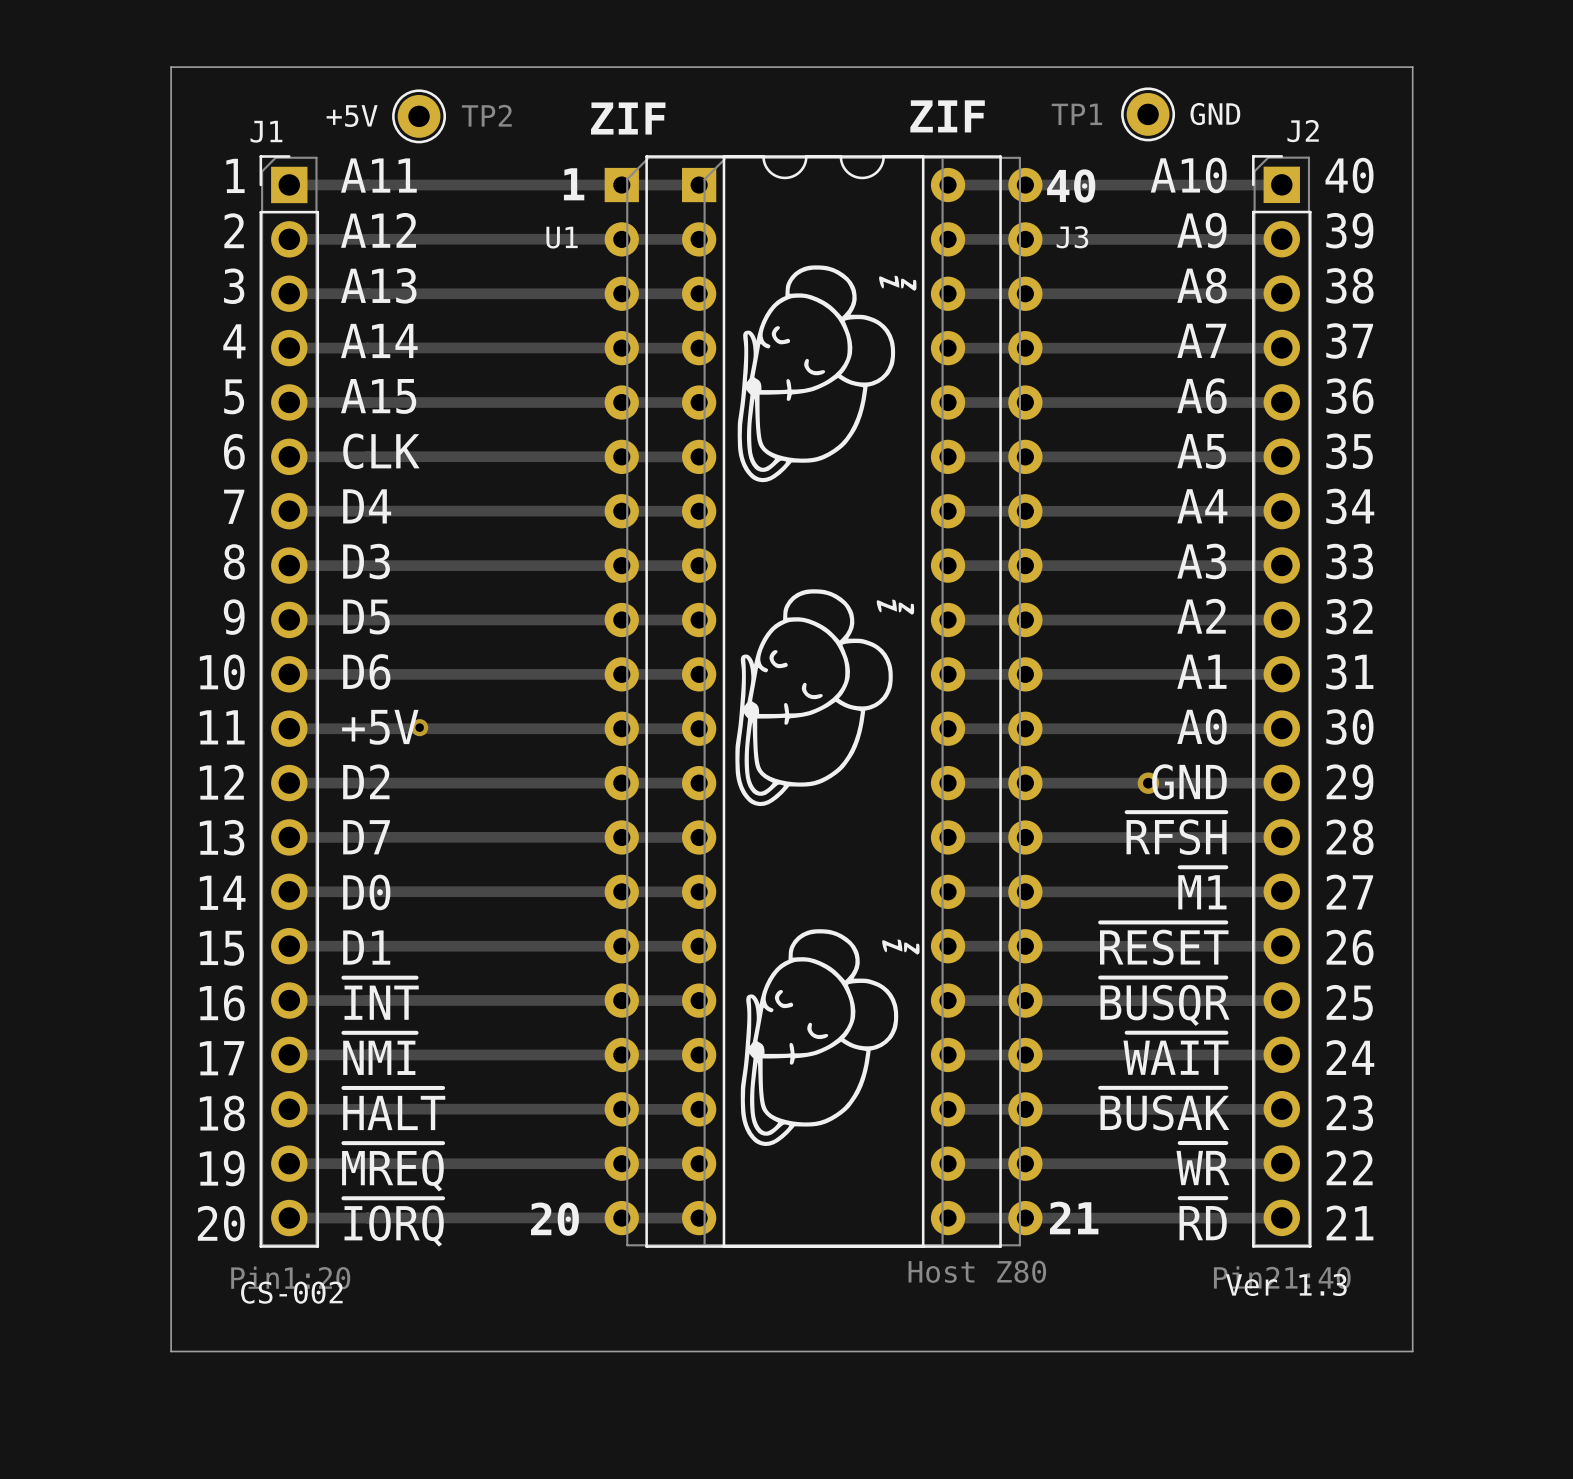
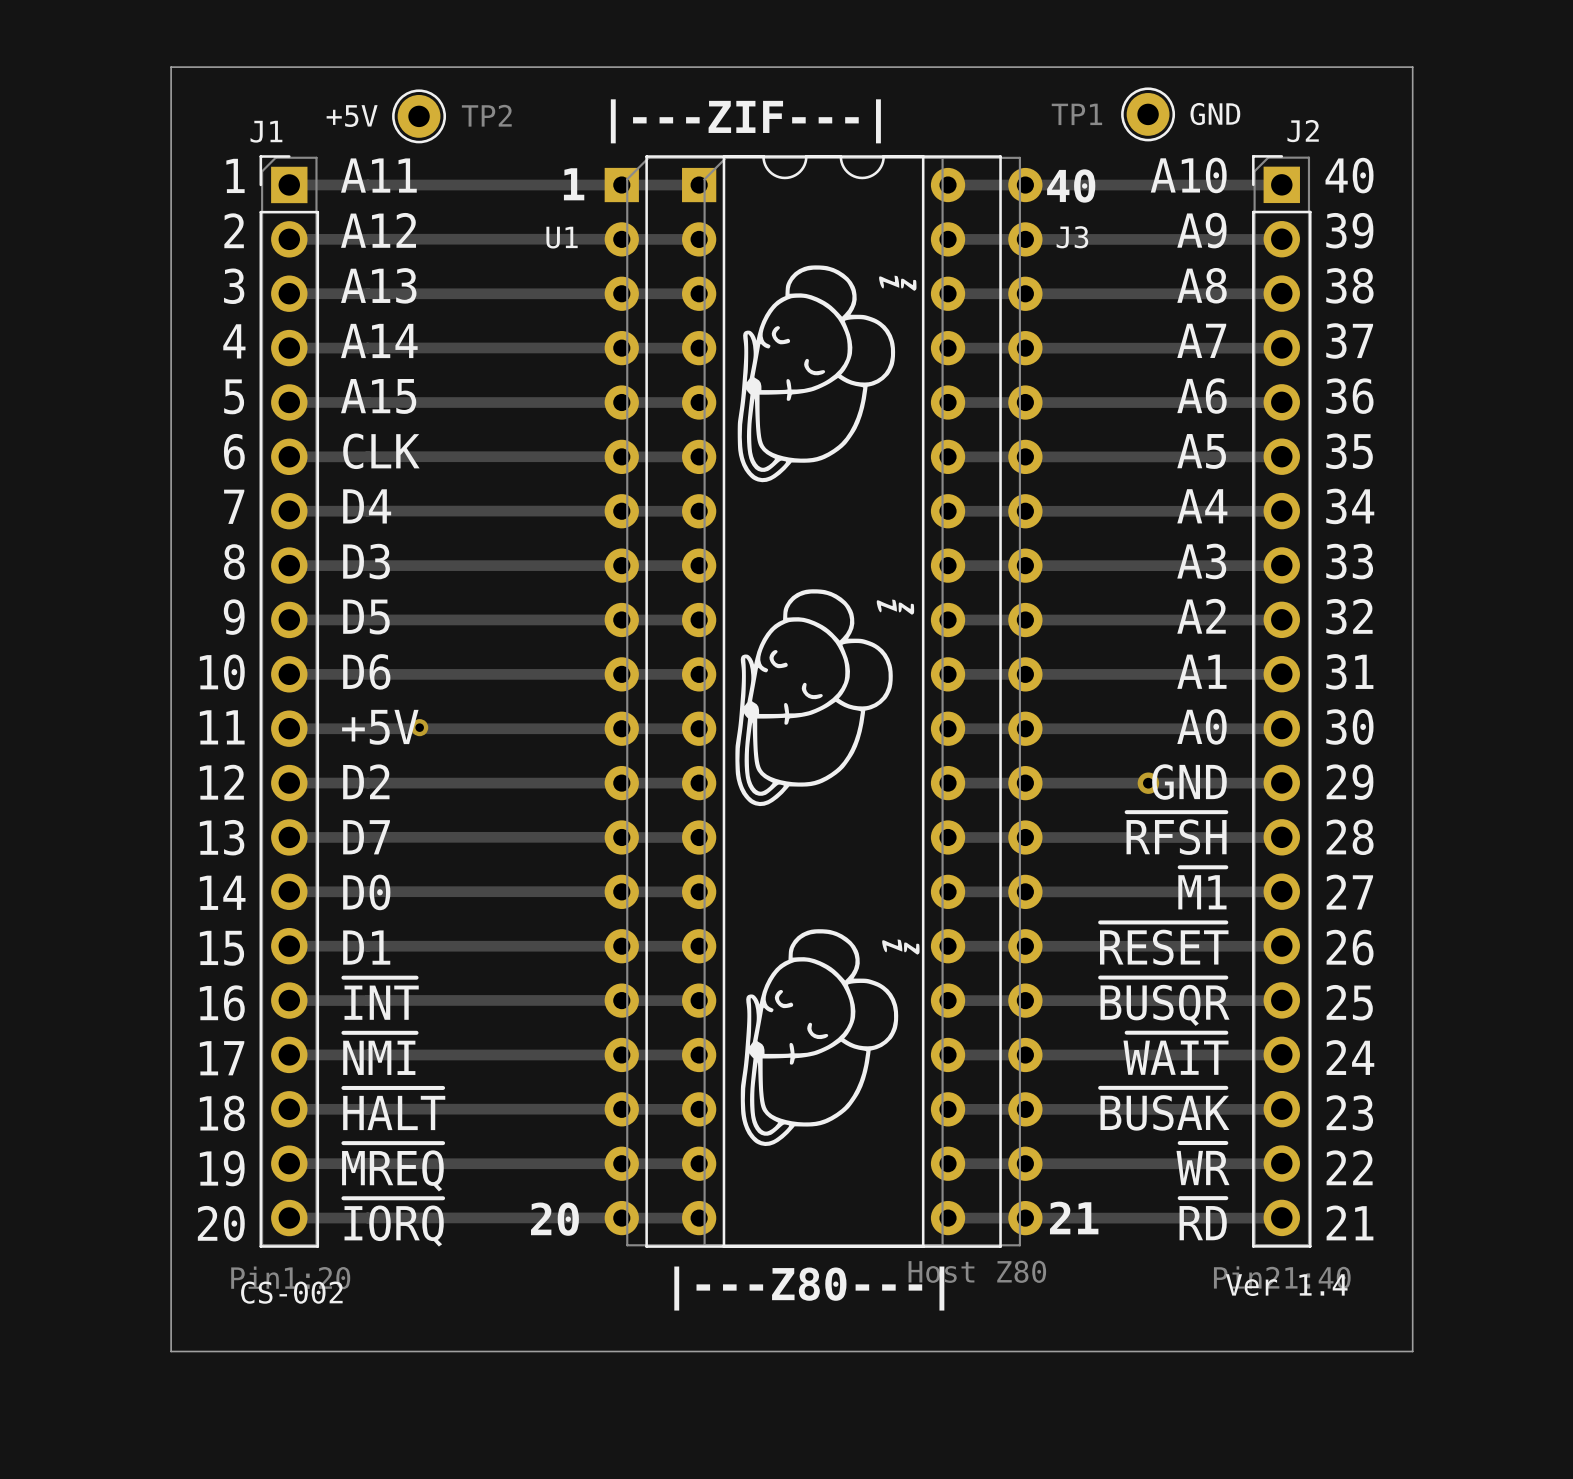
text: ZIF (947, 116) -> none
text: ZIF (628, 118) -> |---ZIF---| (745, 121)
text: Ver 1.3 (1286, 1284) -> Ver 1.4 (1286, 1285)
text: none -> |---Z80---| (809, 1288)

